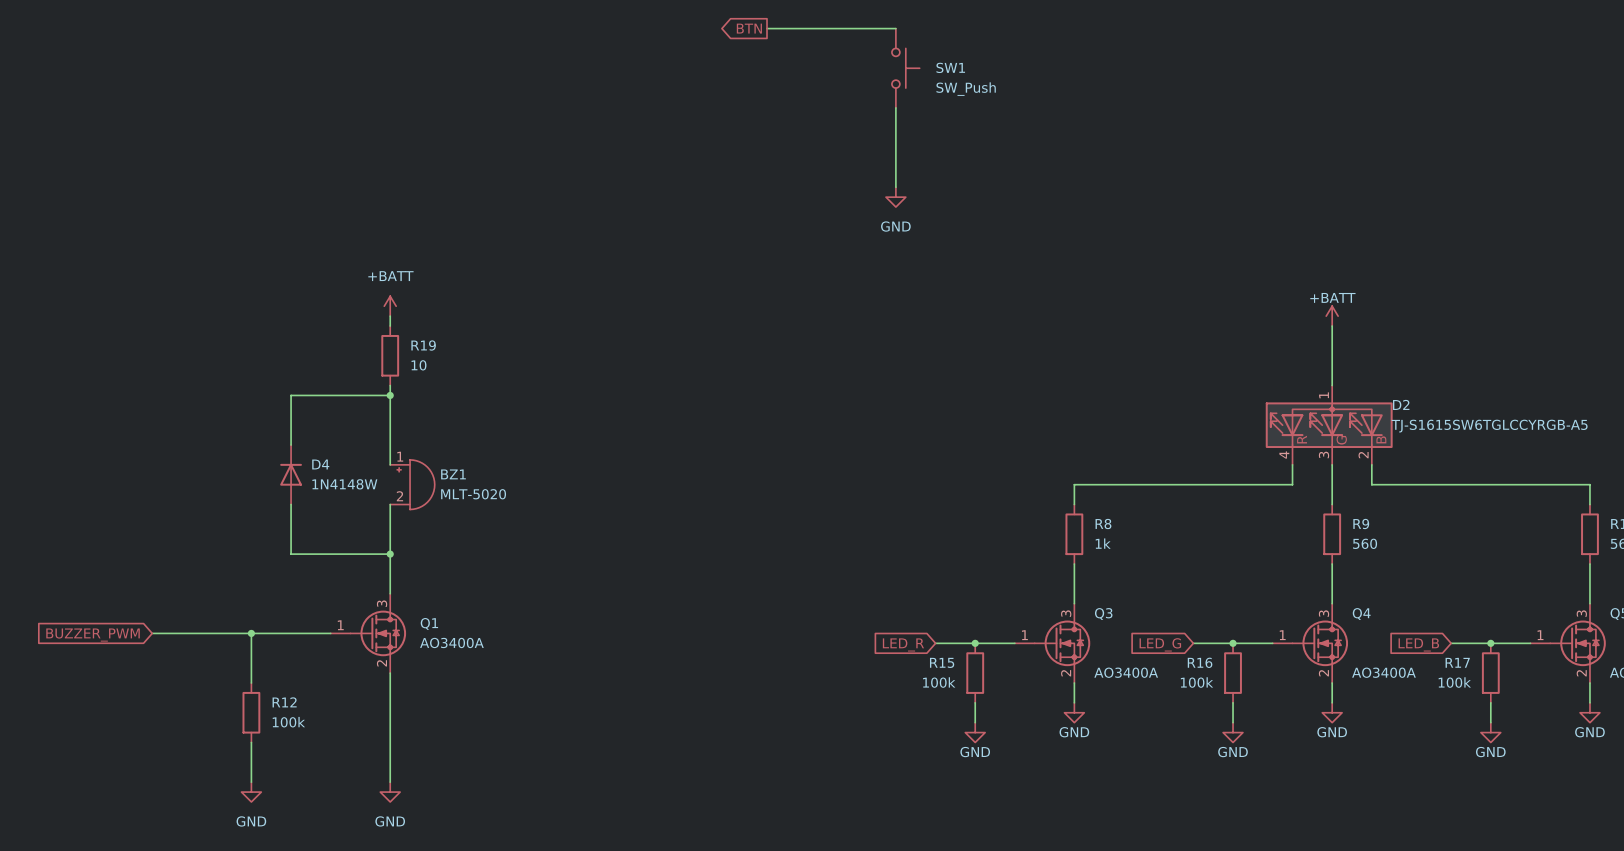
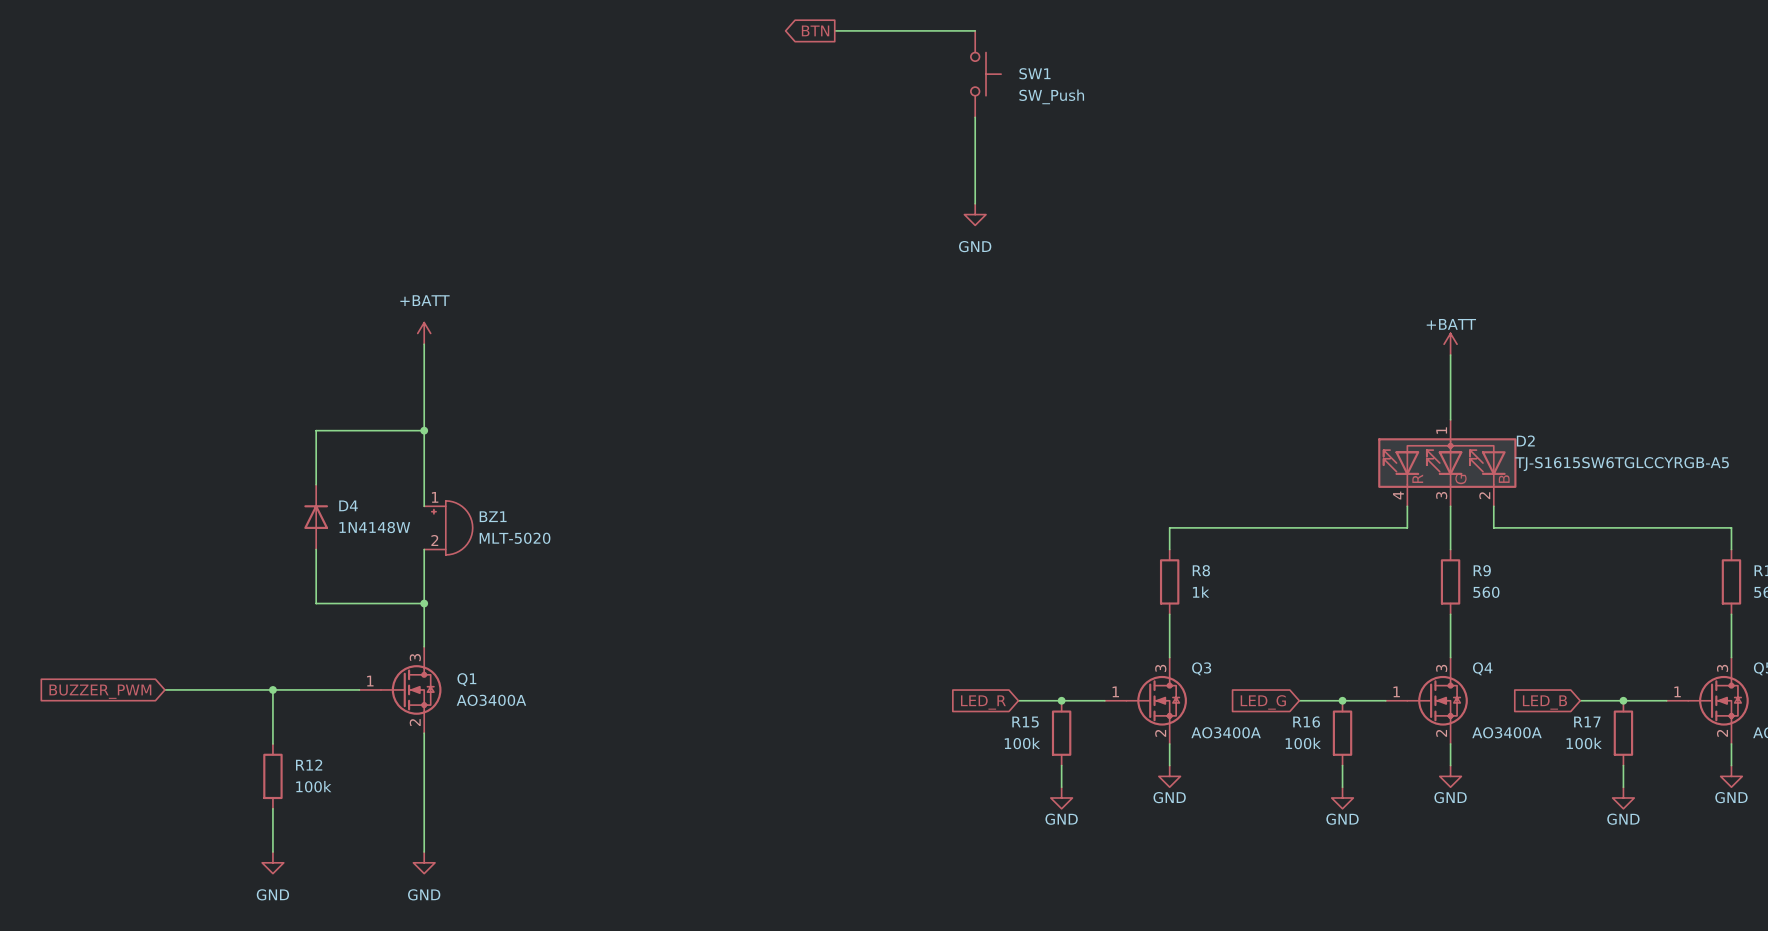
wire: none -> (424, 355) (424, 419)
R19: 10 (390, 355) -> none

